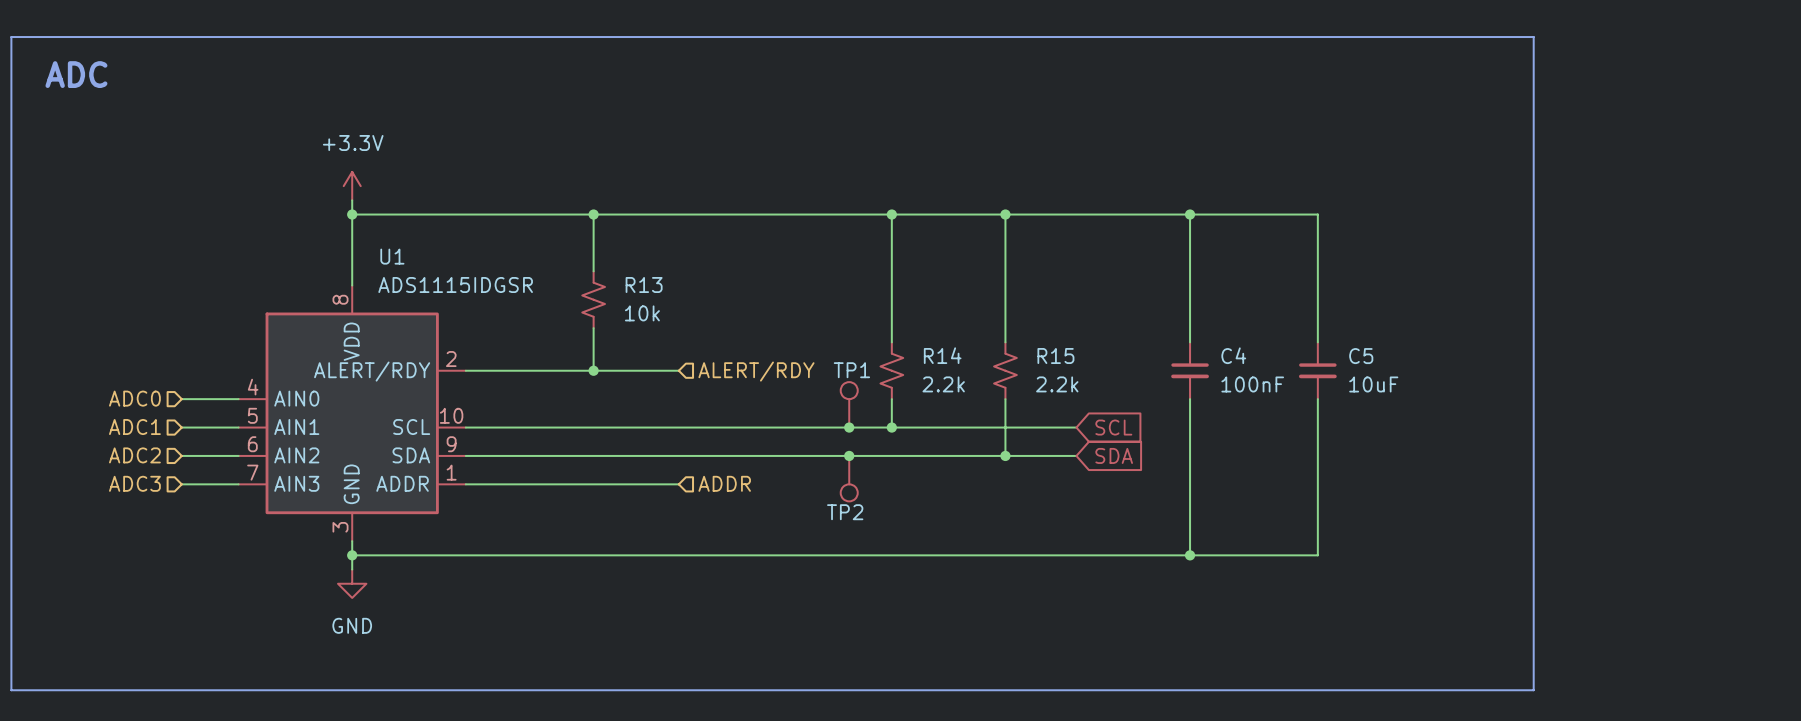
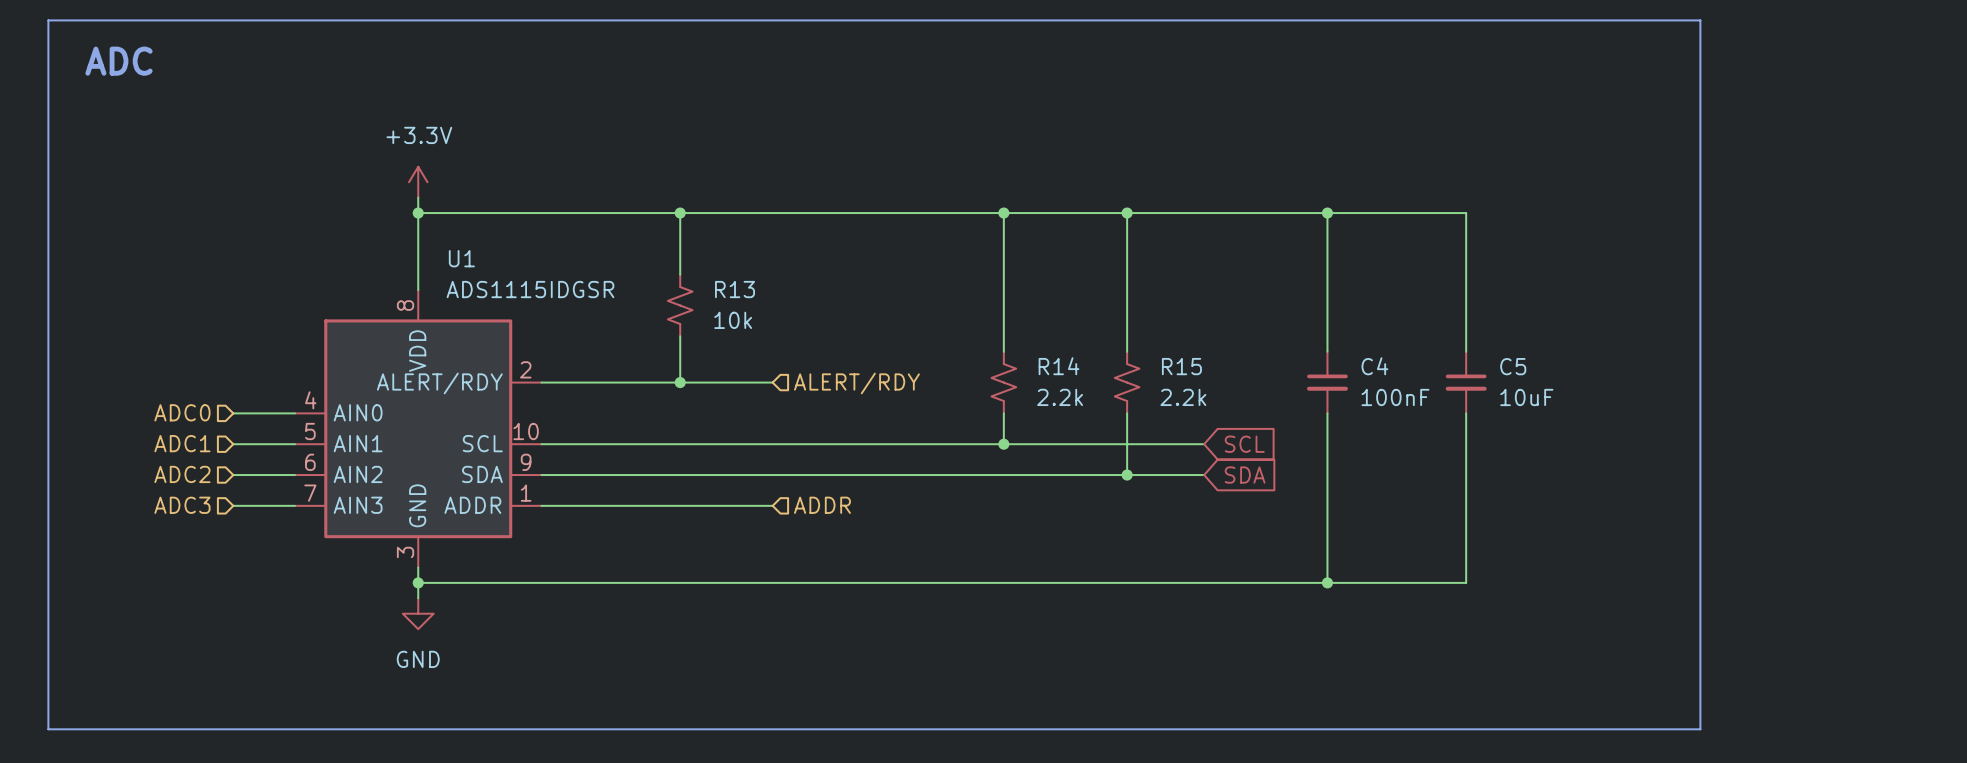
TP1: (849, 404) -> none
junction: (849, 427) -> none
junction: (849, 455) -> none
TP2: (849, 478) -> none

